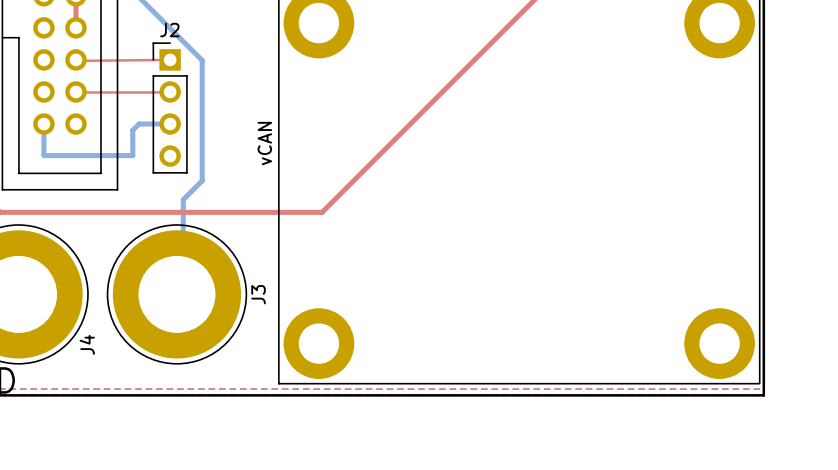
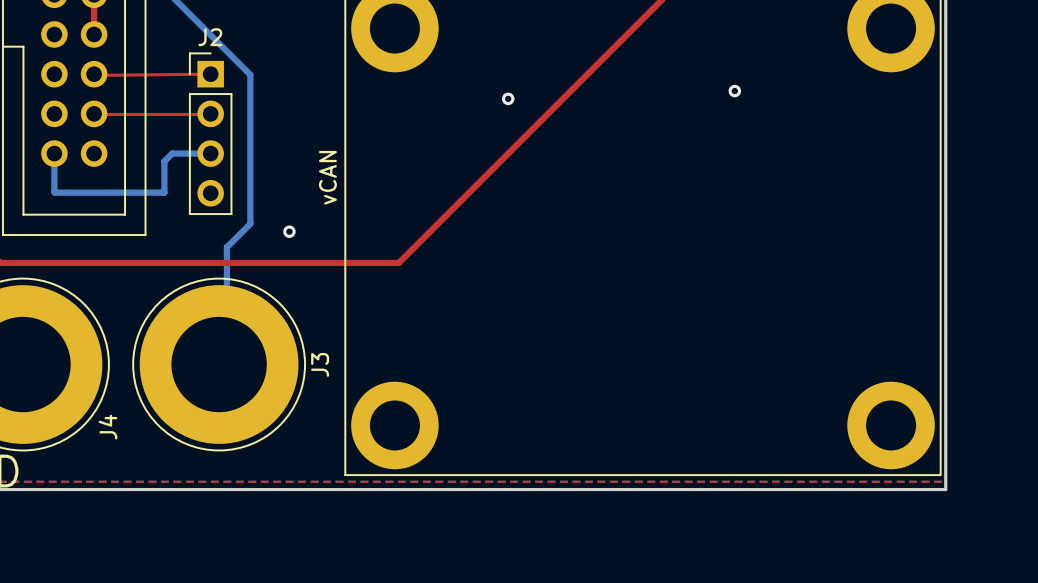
via: none -> (734, 91)
via: none -> (508, 98)
via: none -> (289, 231)

